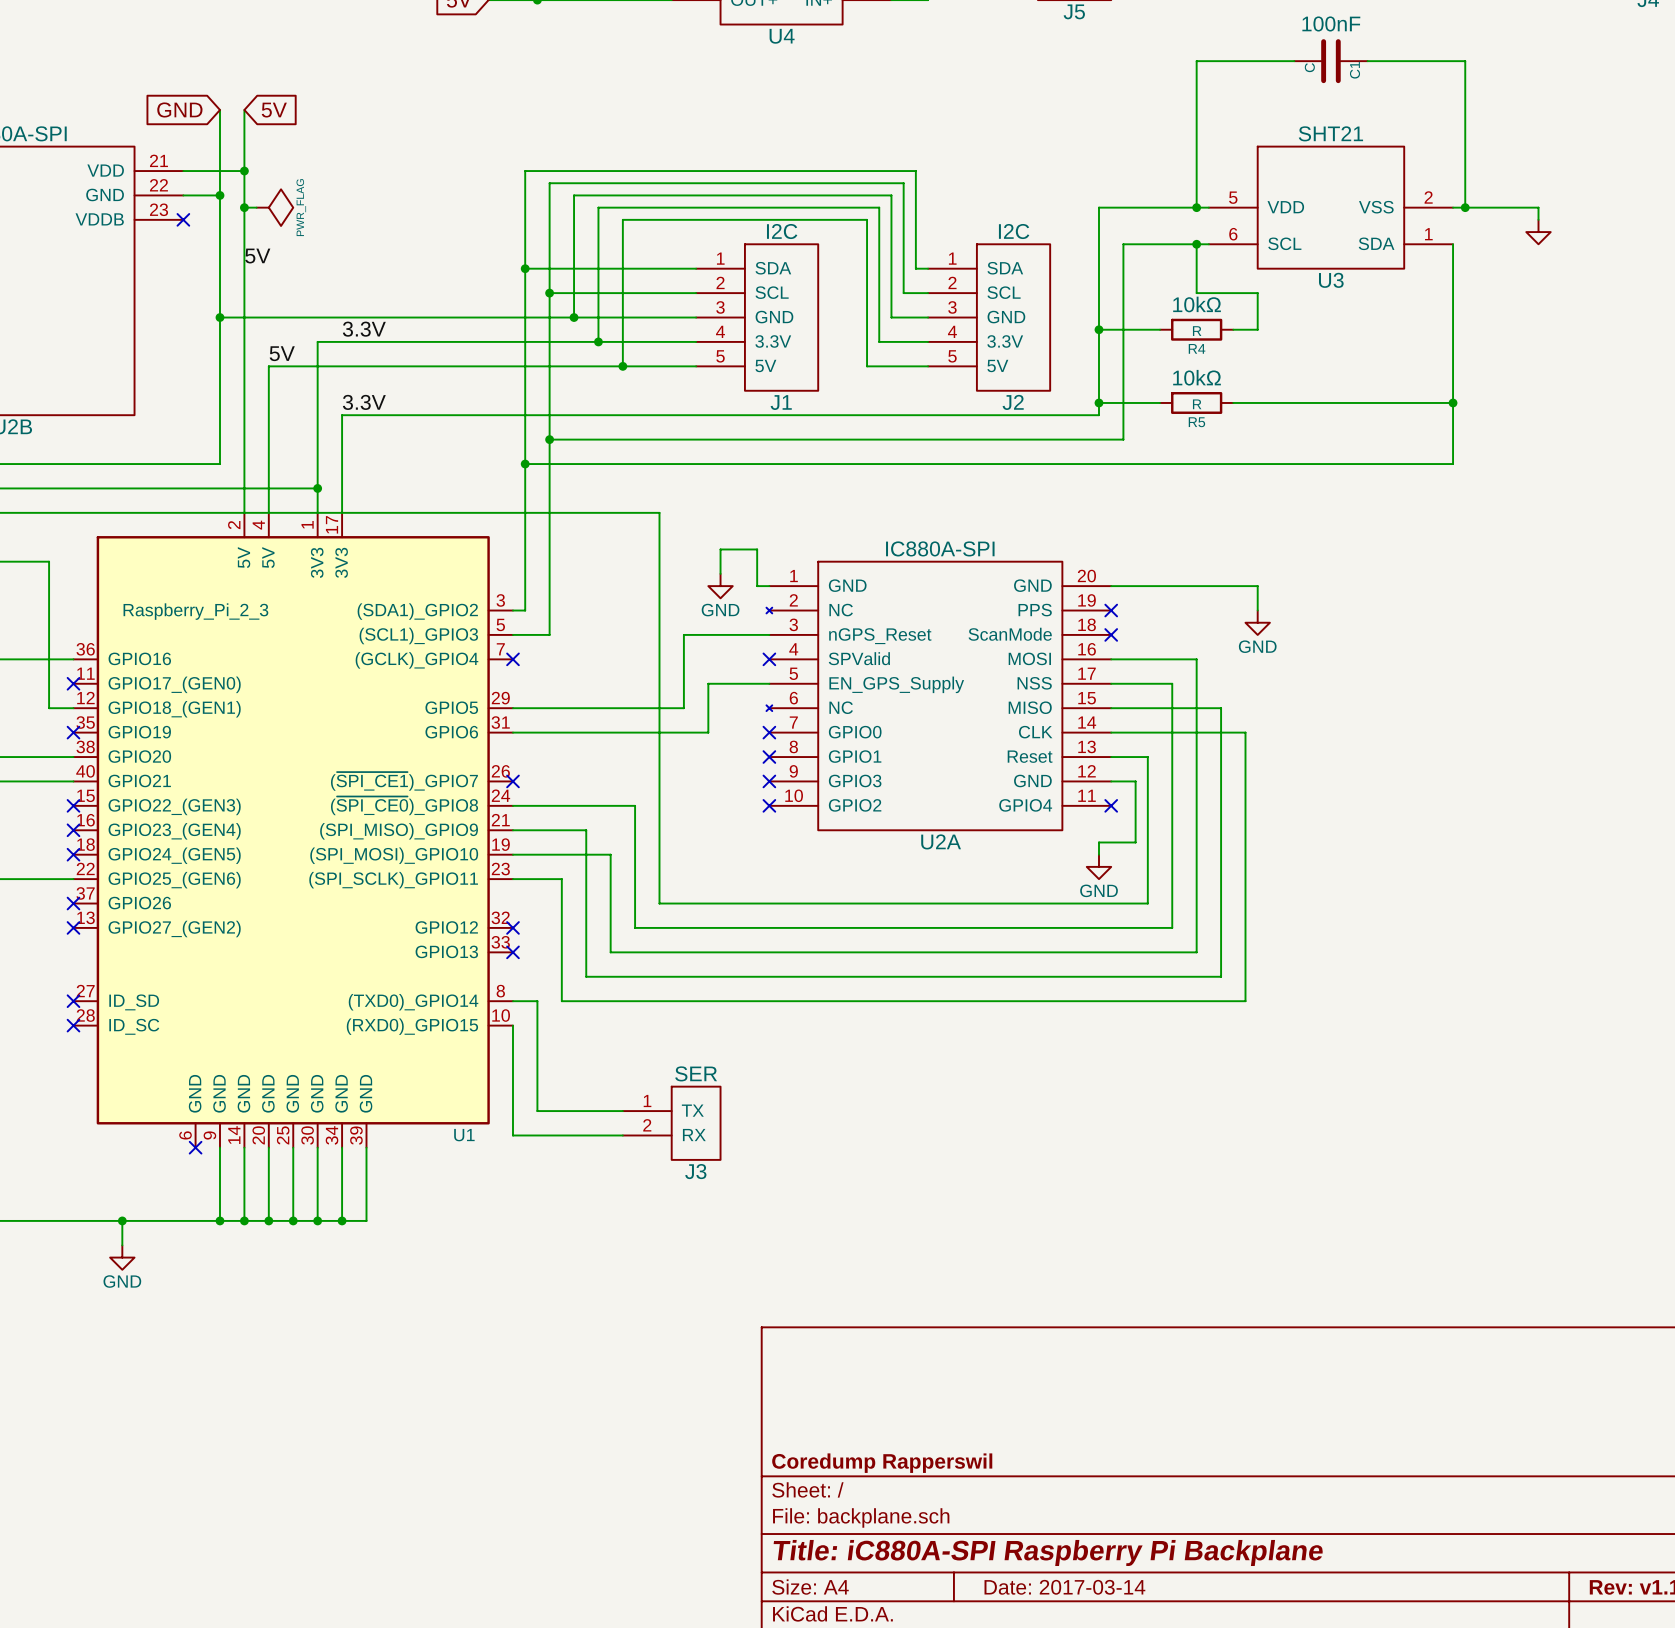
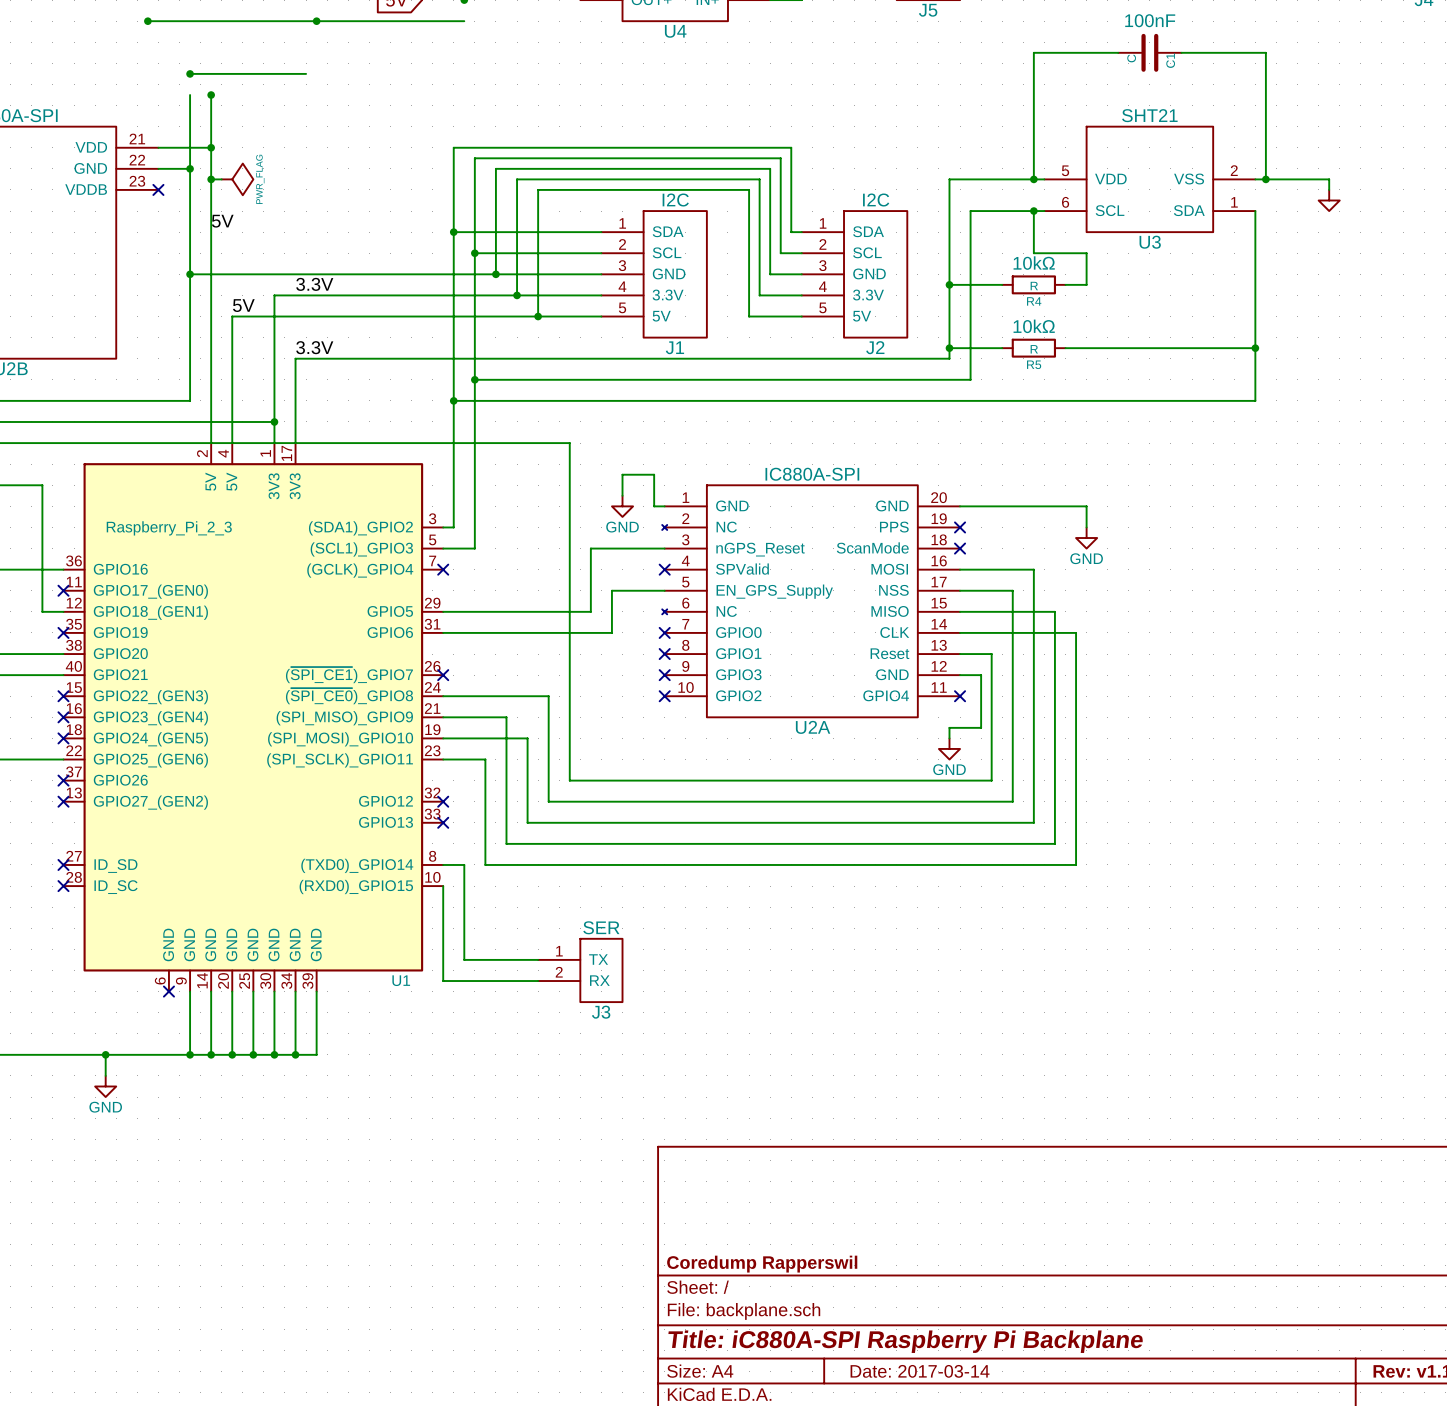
wire: (488, 0) (671, 0) -> none
wire: none -> (147, 21) (464, 21)
junction: none -> (147, 21)
junction: none -> (316, 21)
wire: none -> (190, 73) (306, 73)
junction: none -> (190, 73)
global label: GND (179, 109) -> none
junction: none -> (211, 95)
global label: 5V (274, 110) -> none

